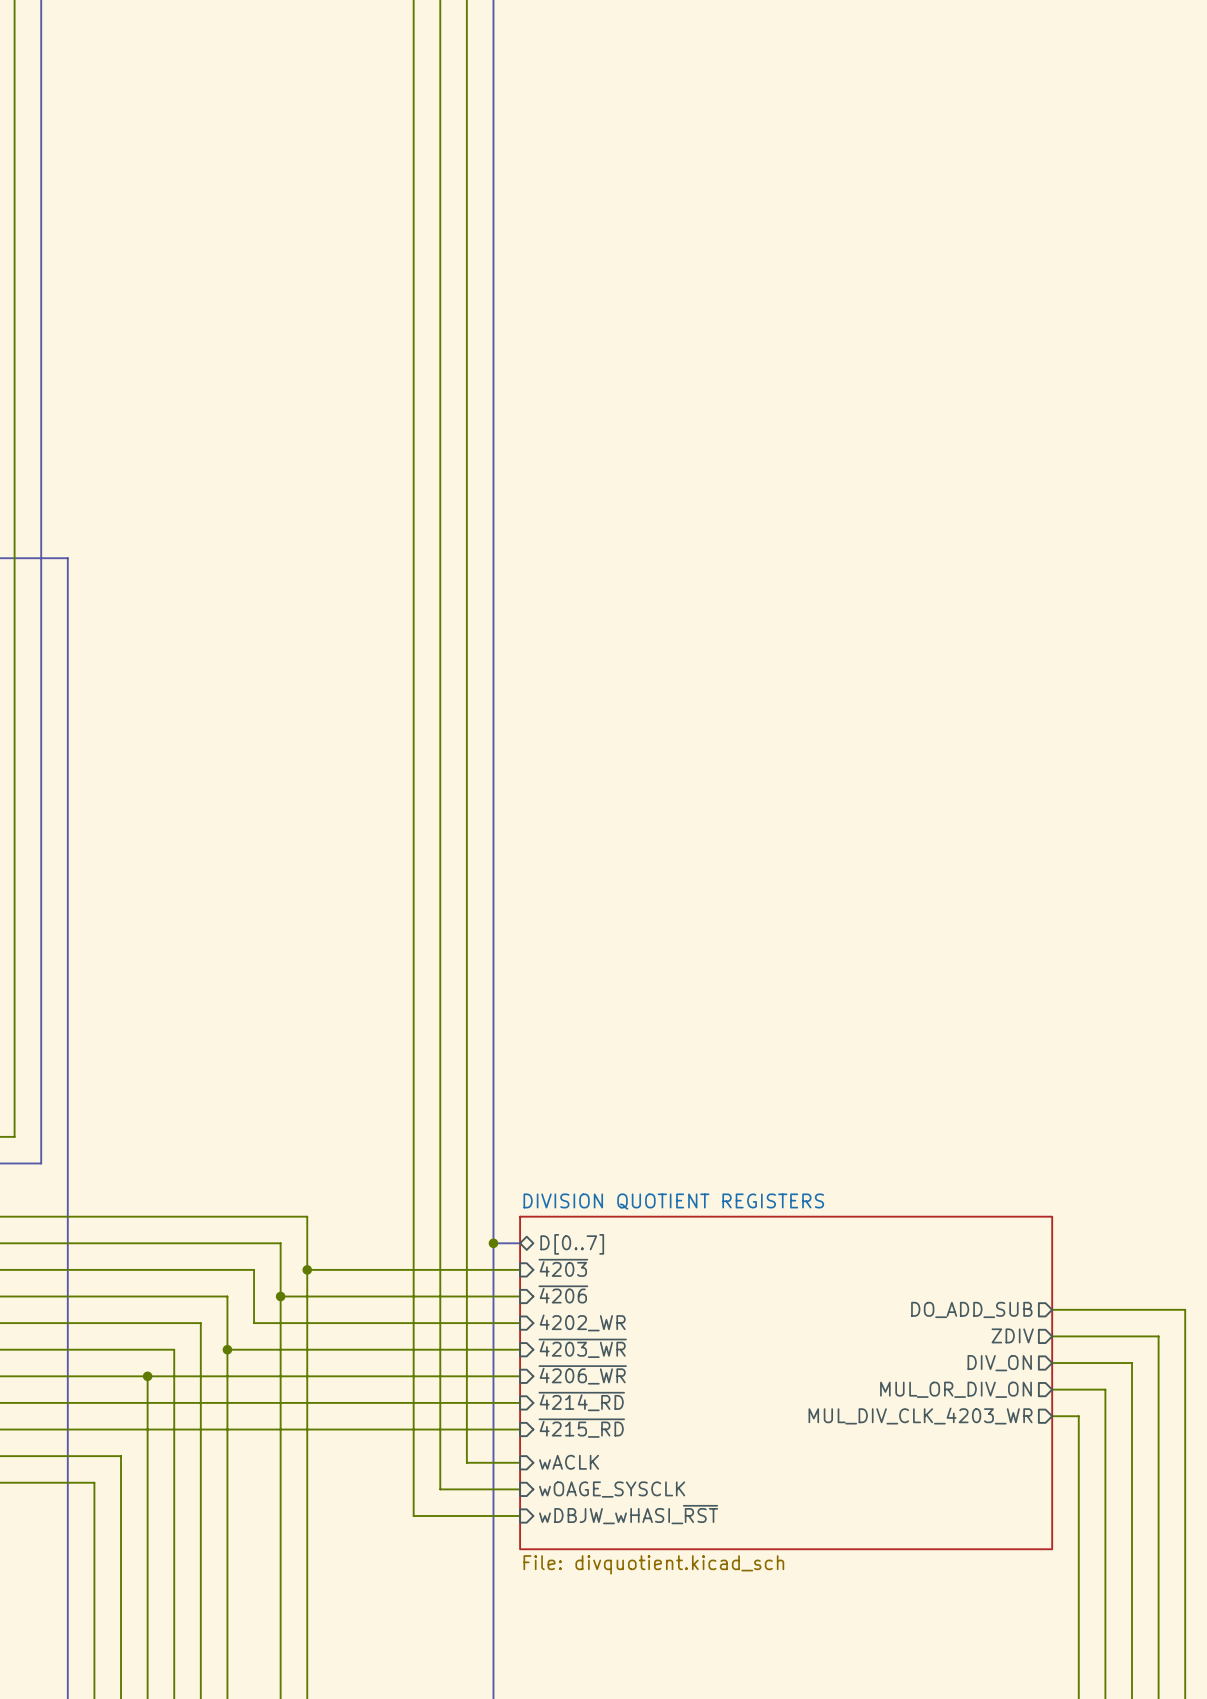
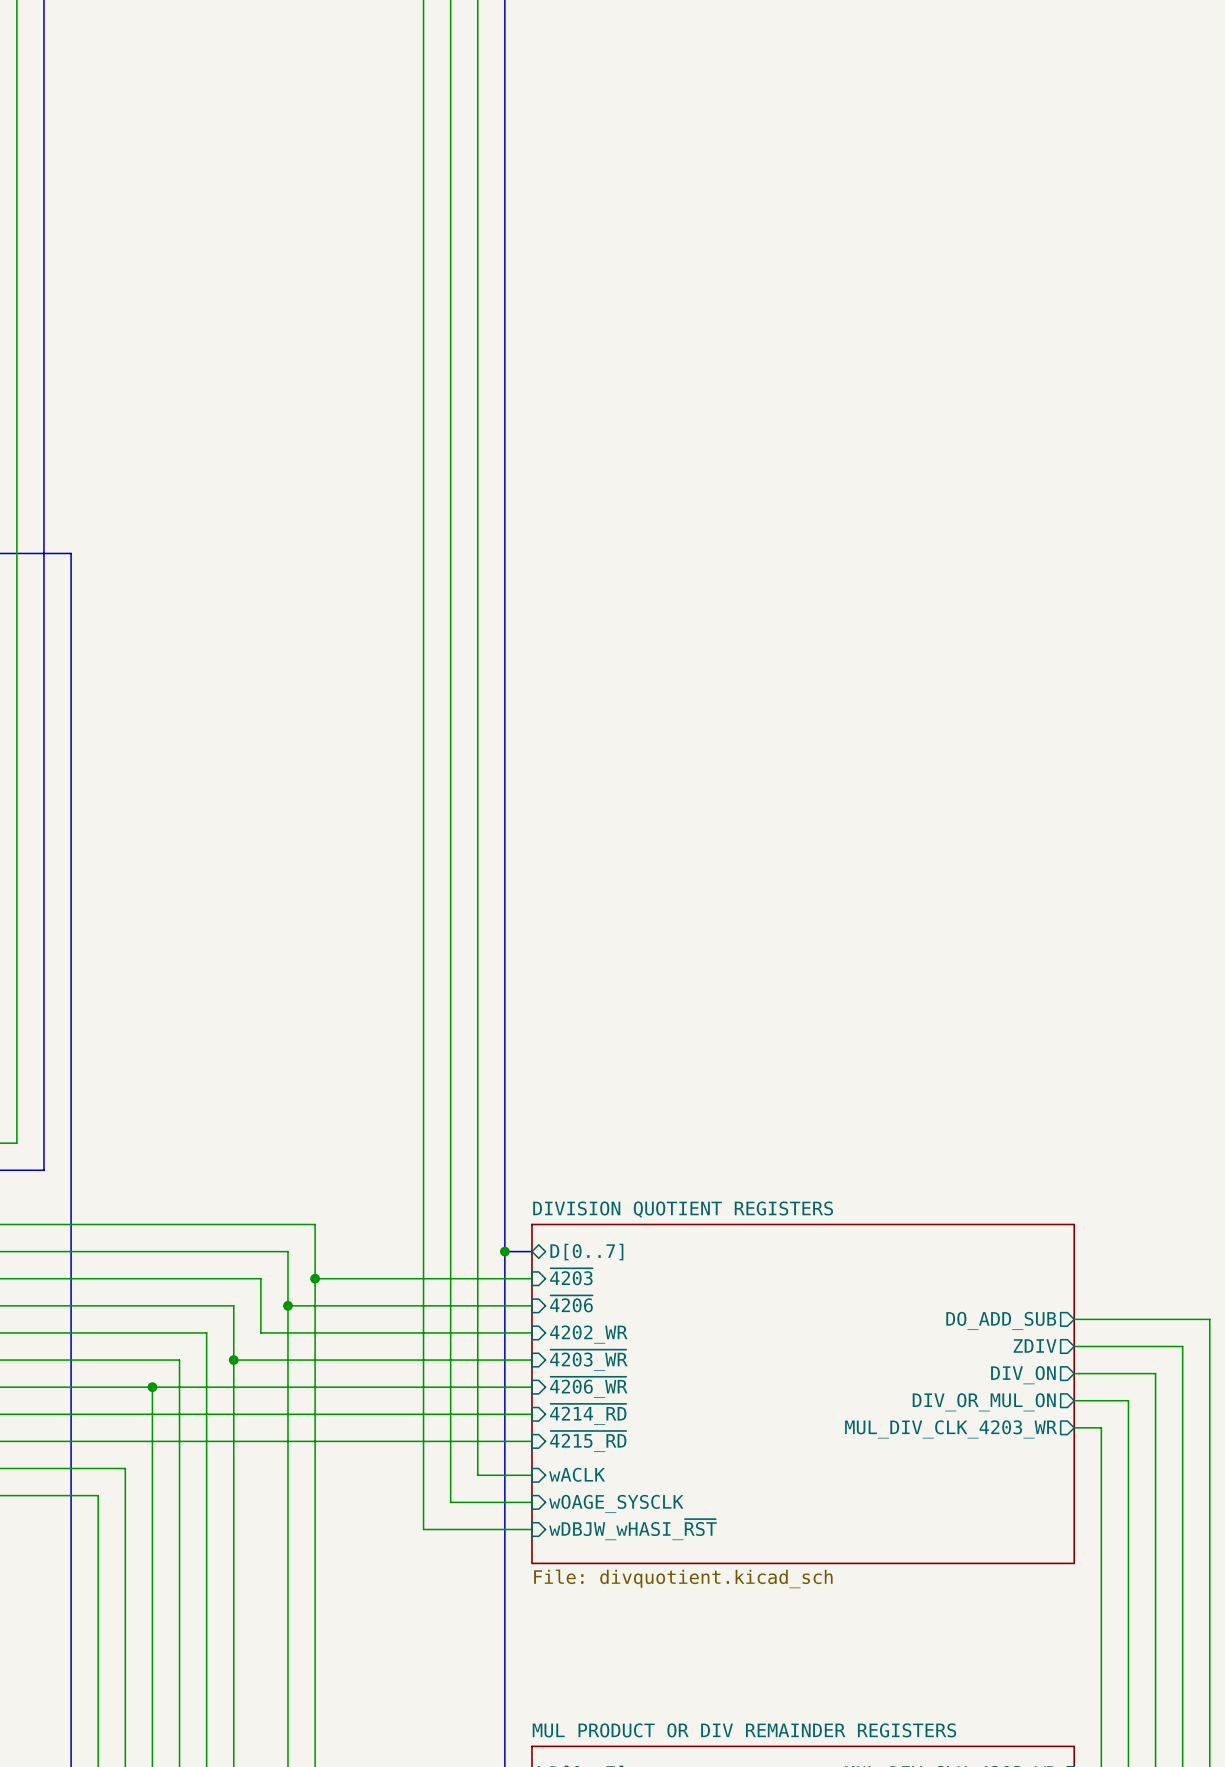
sheet pin: MUL_OR_DIV_ON (956, 1389) -> DIV_OR_MUL_ON (984, 1402)

